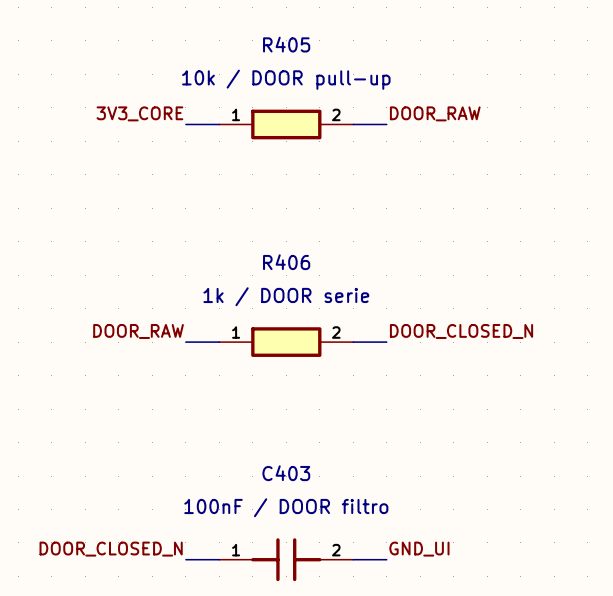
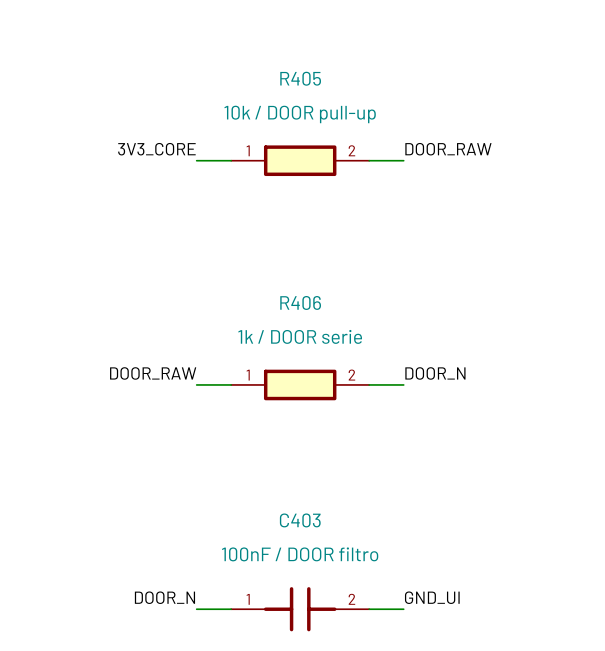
label: DOOR_CLOSED_N (461, 331) -> DOOR_N (435, 373)
label: DOOR_CLOSED_N (111, 549) -> DOOR_N (164, 597)

